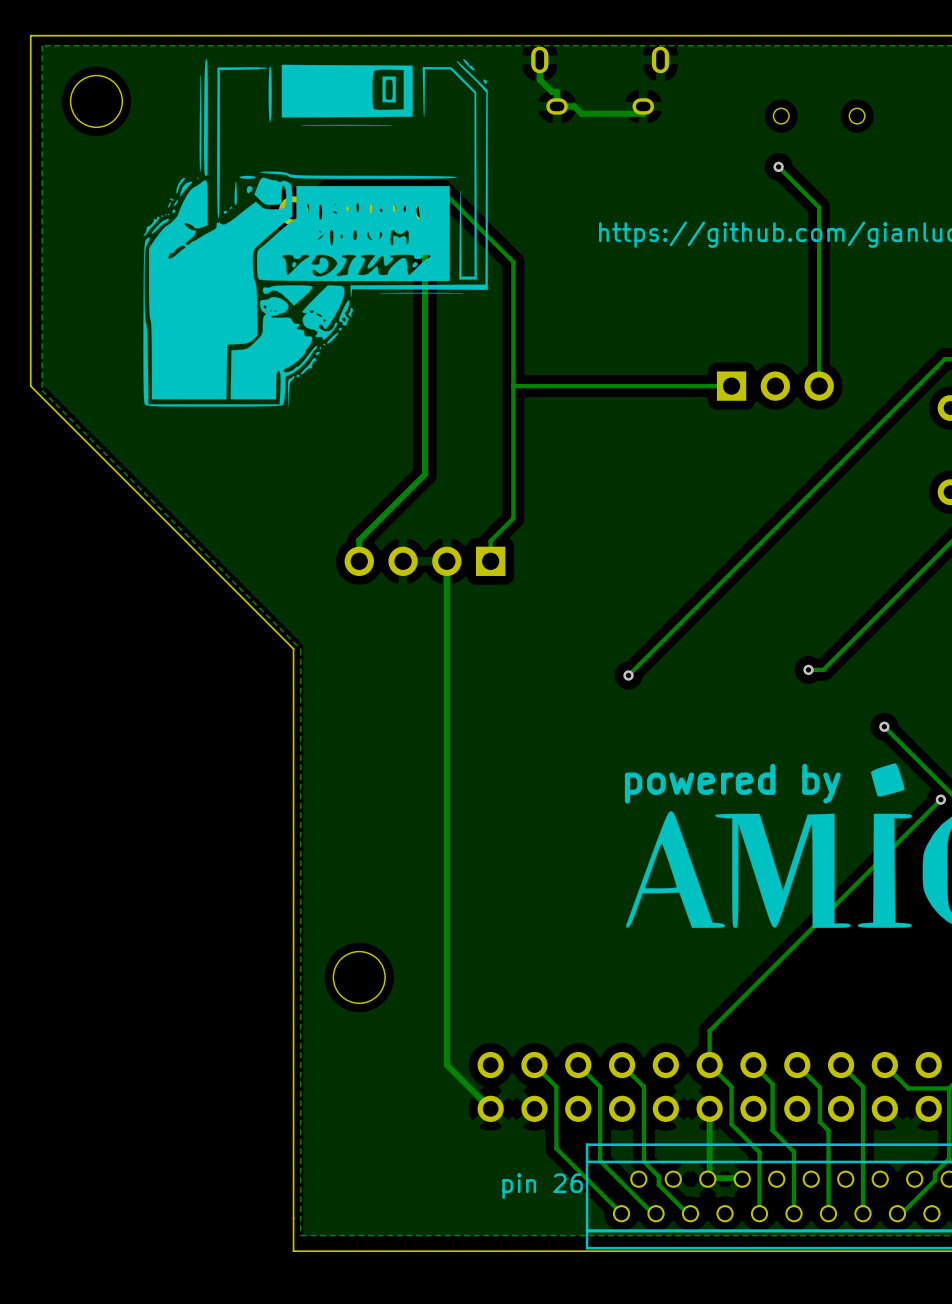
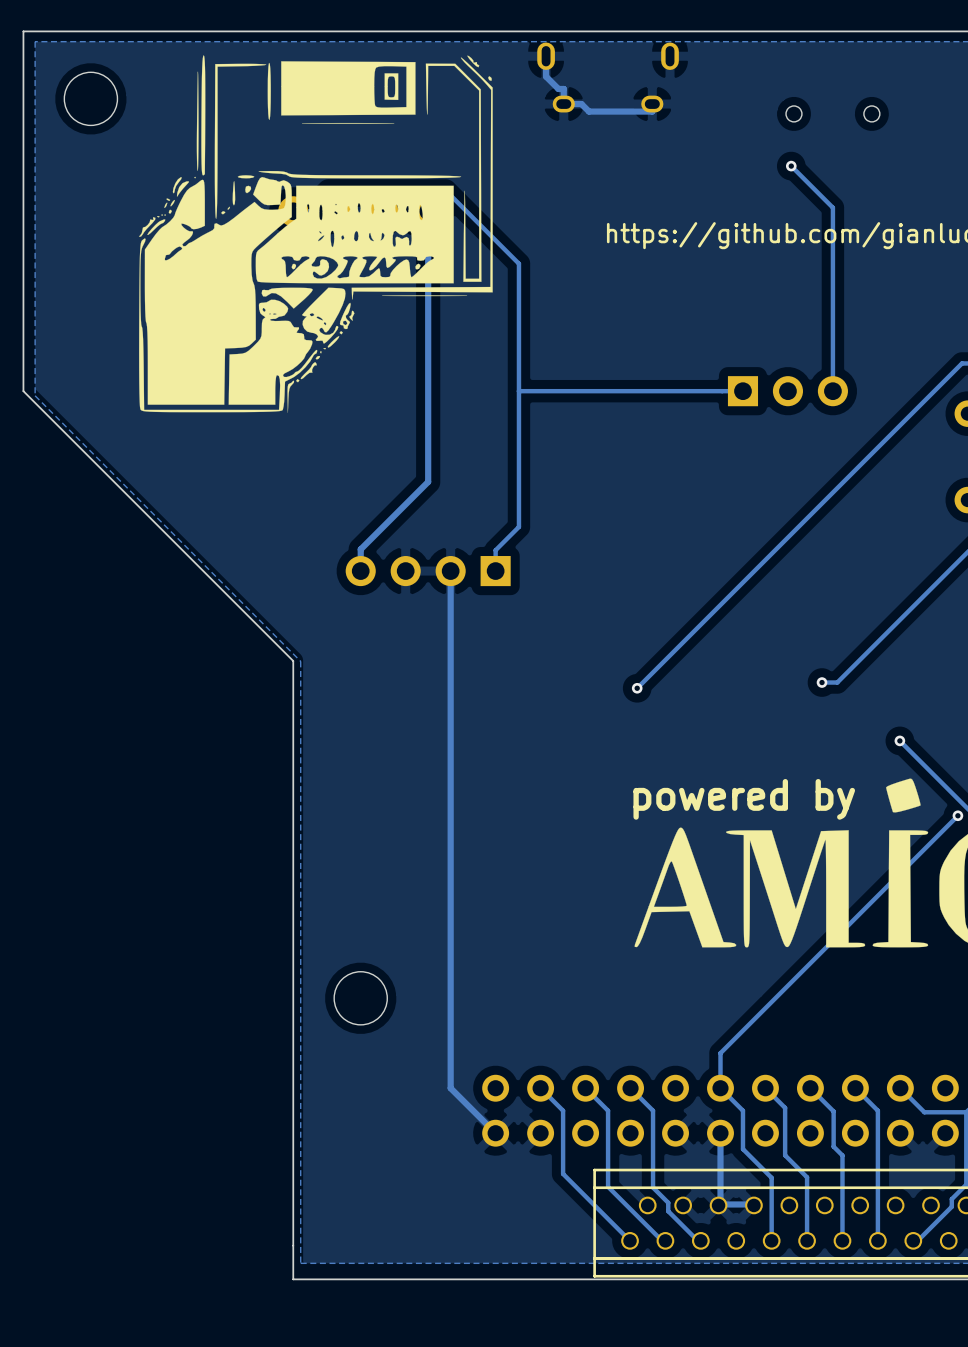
text: pin 26 (542, 1186) -> none

